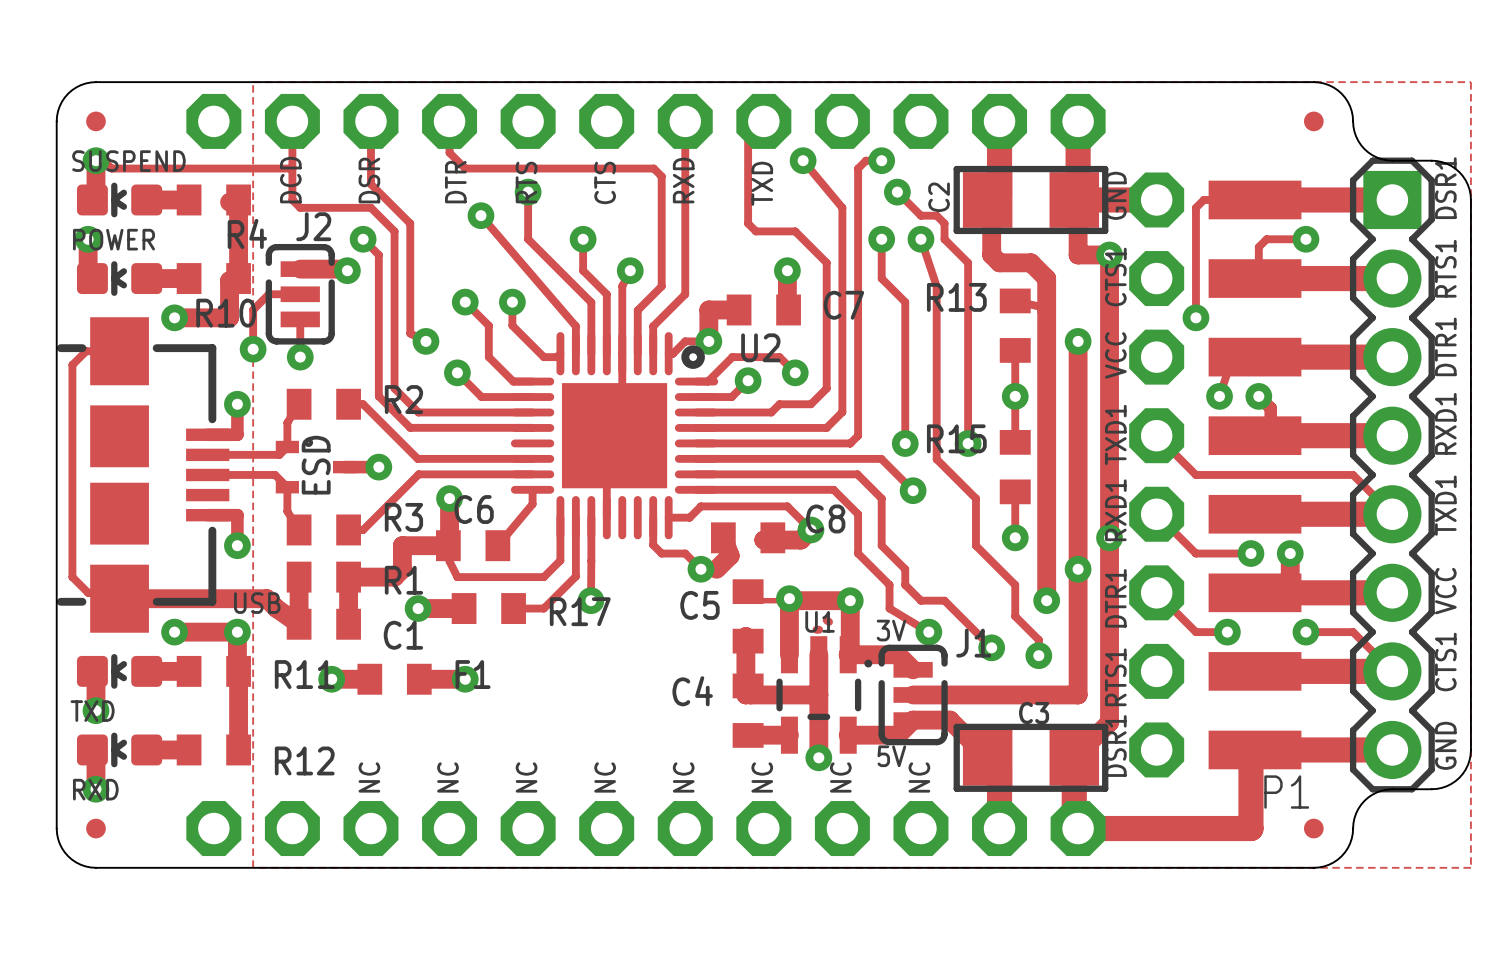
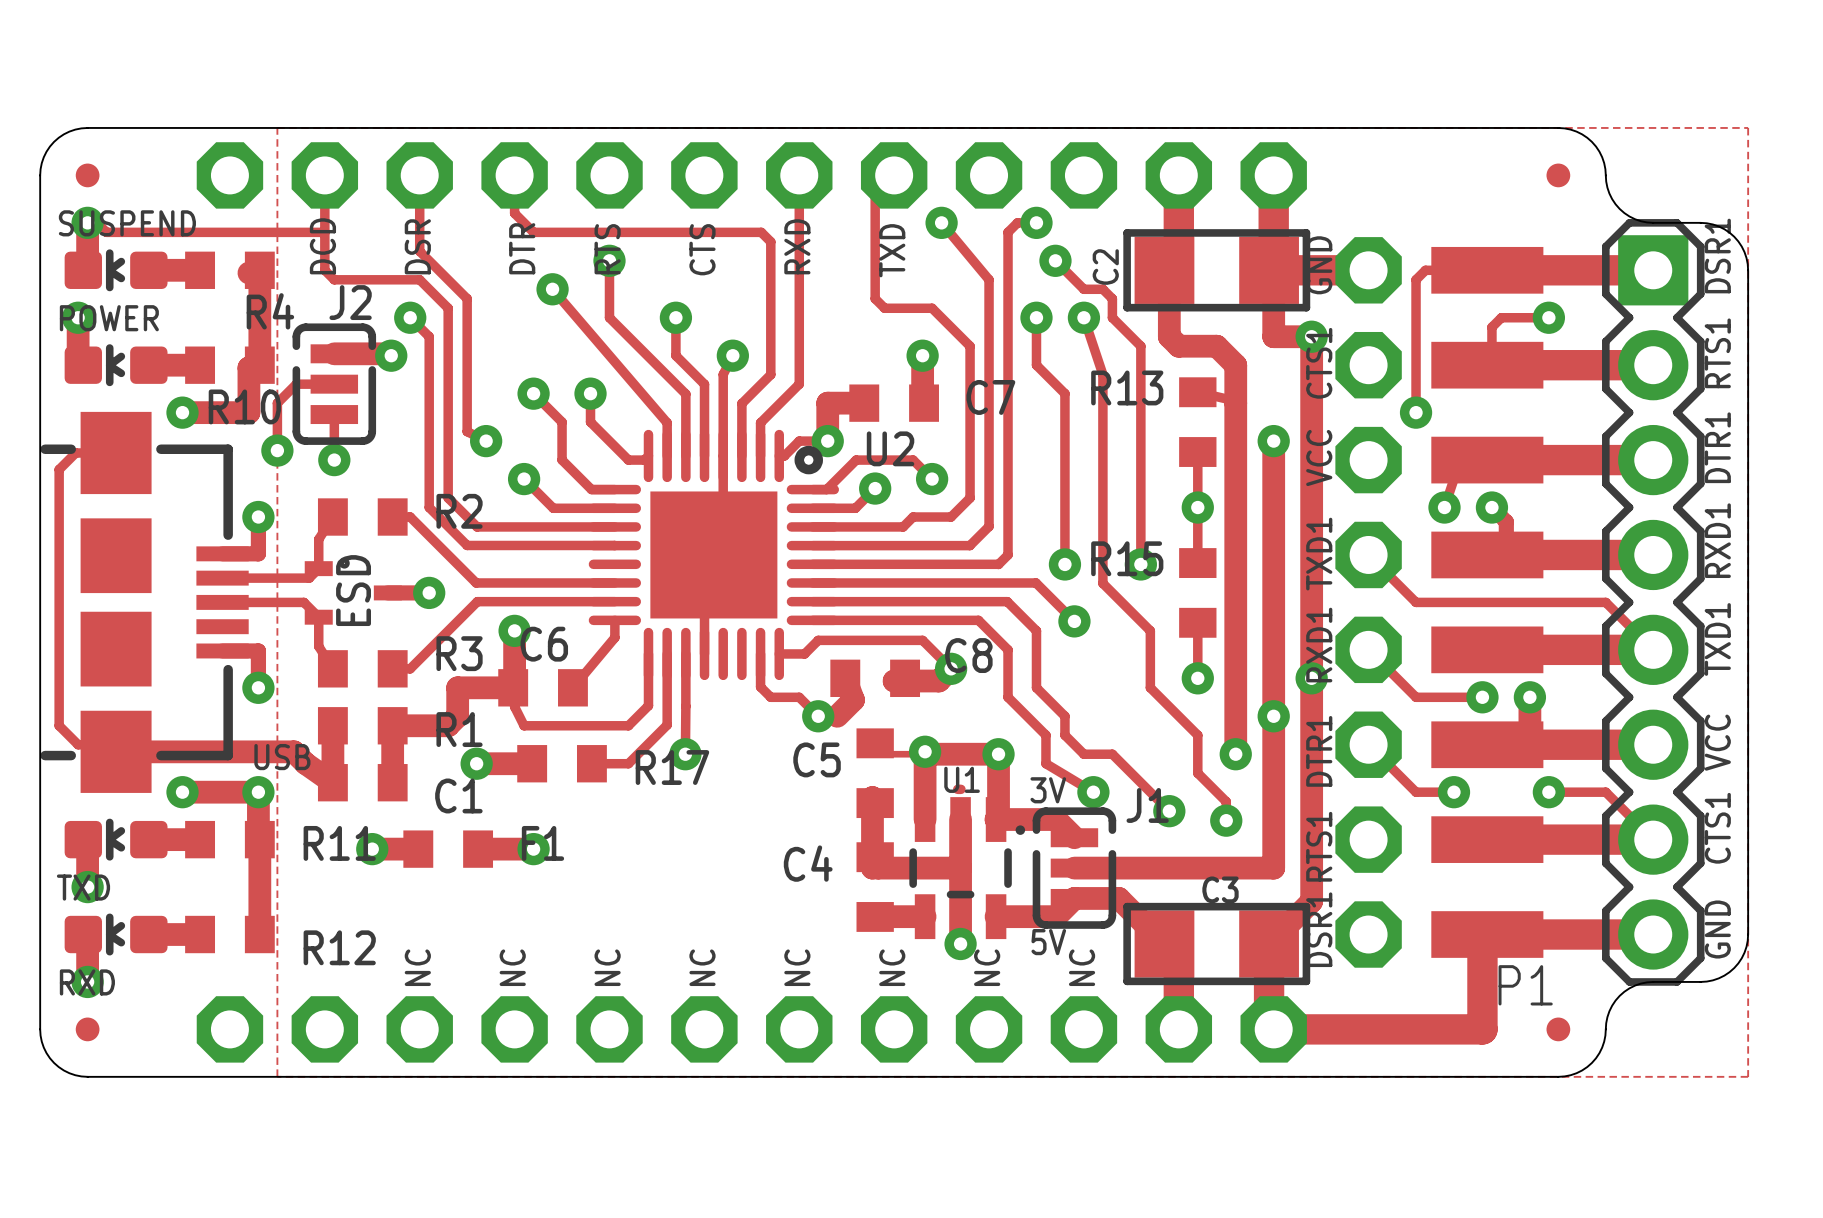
track: (826, 620) (829, 621) -> none

